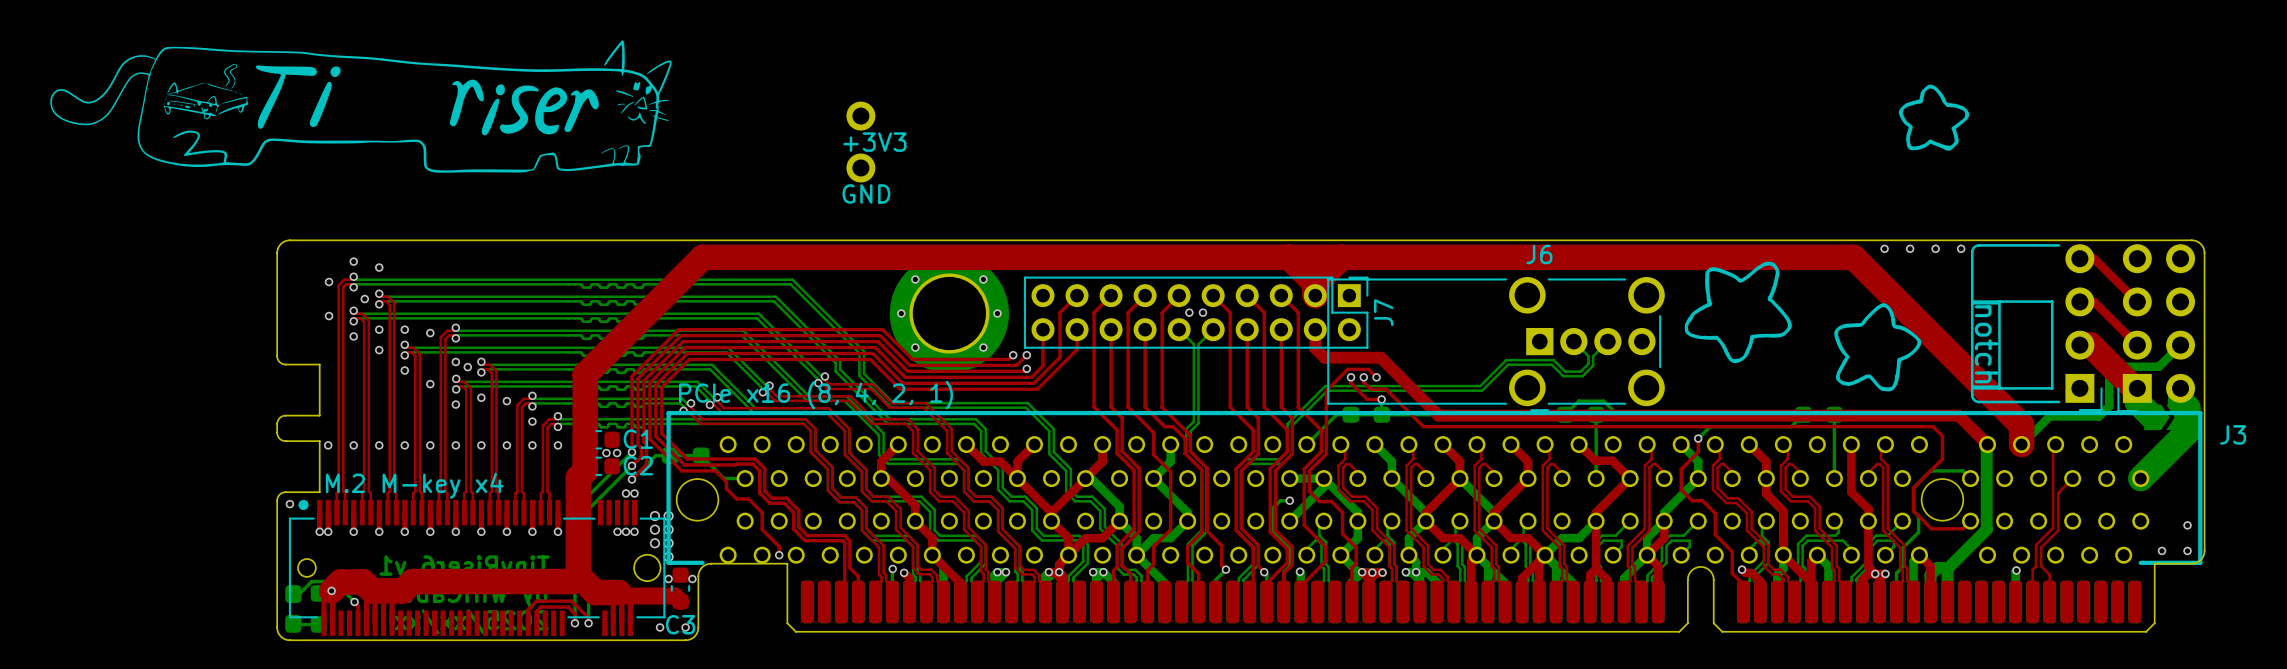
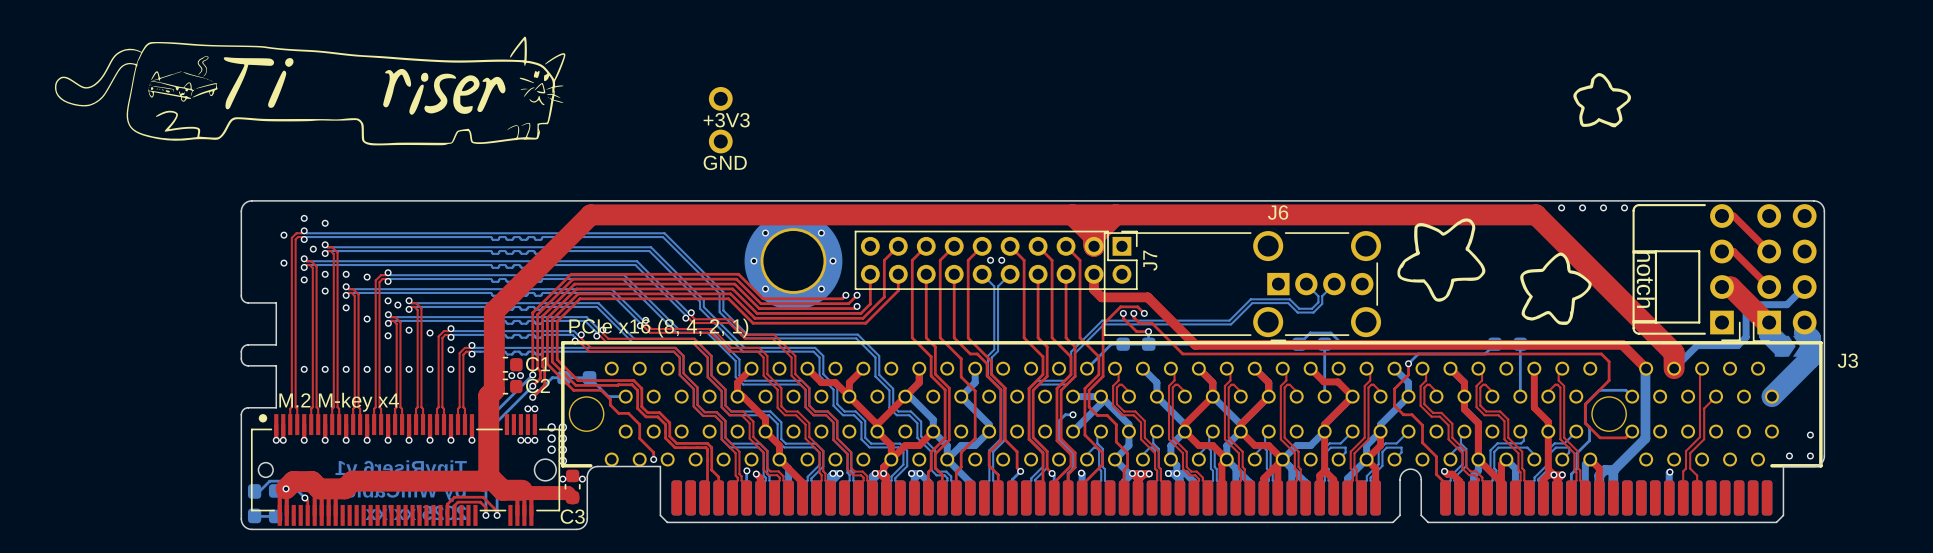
via: (328, 445) -> none
via: (289, 504) -> none
via: (660, 627) -> none
via: (685, 627) -> none

